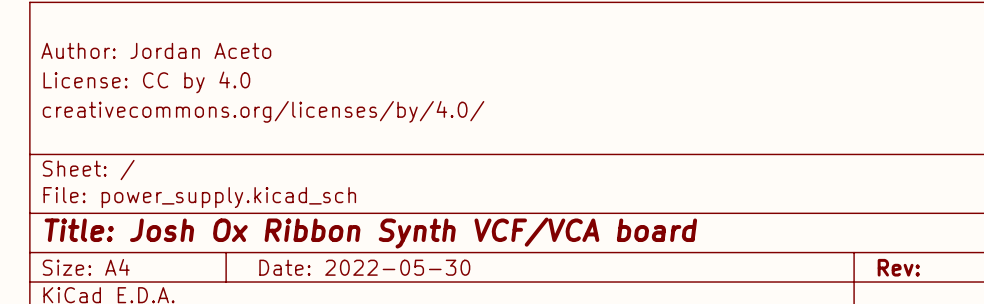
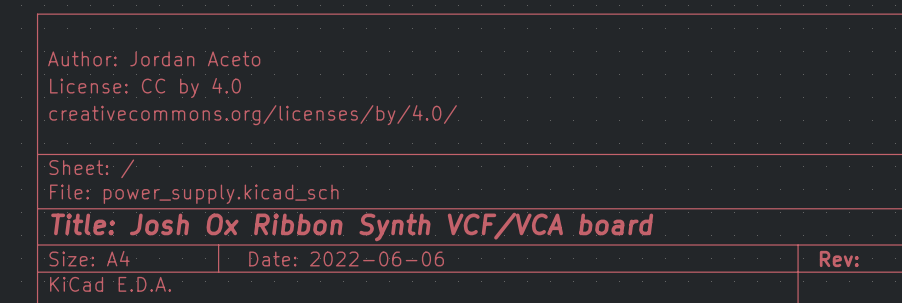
title block: Date: 2022-05-30 (364, 267) -> Date: 2022-06-06 (346, 258)

